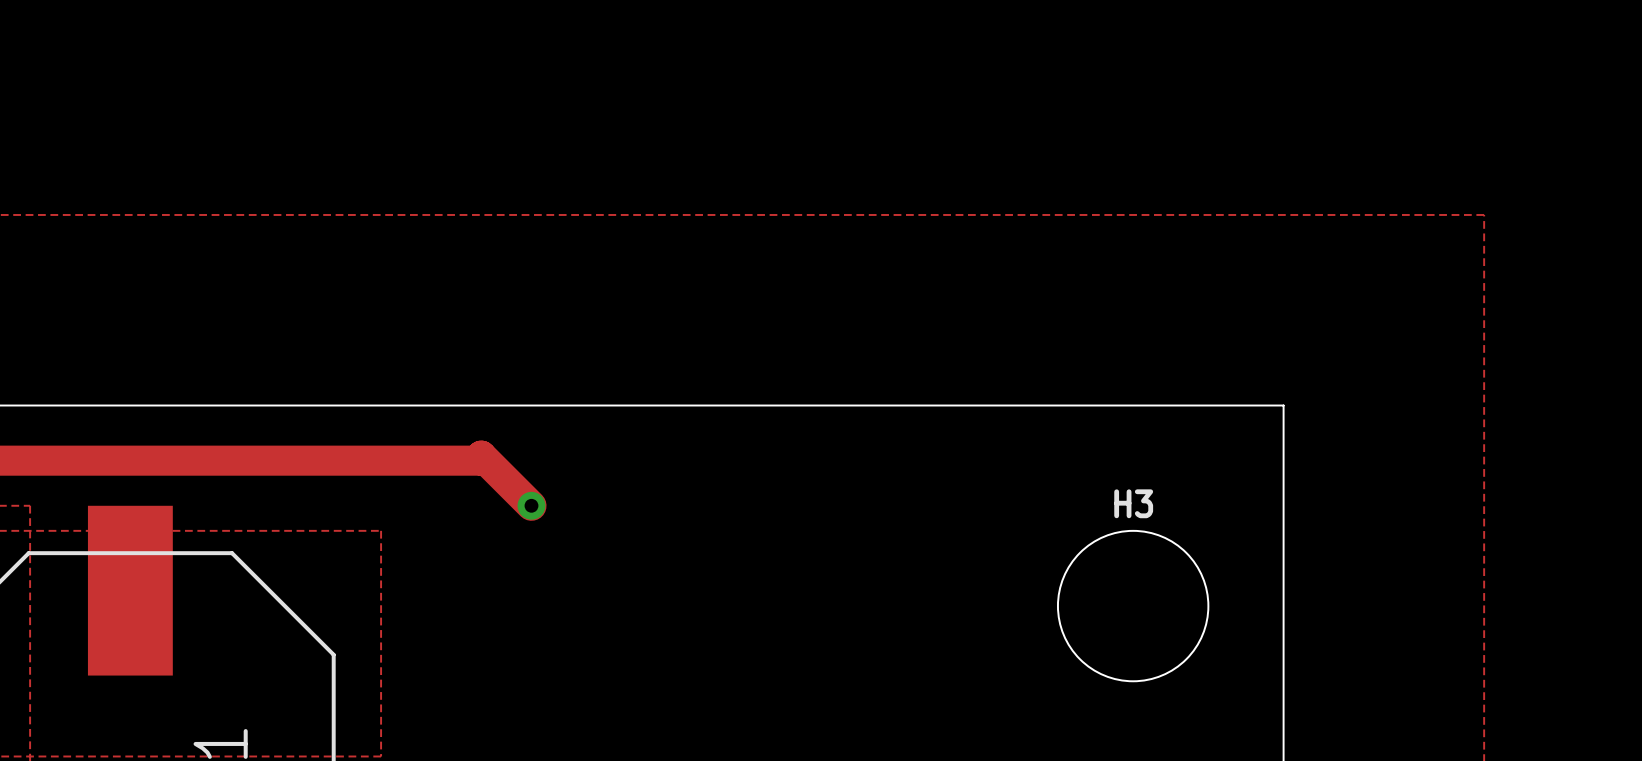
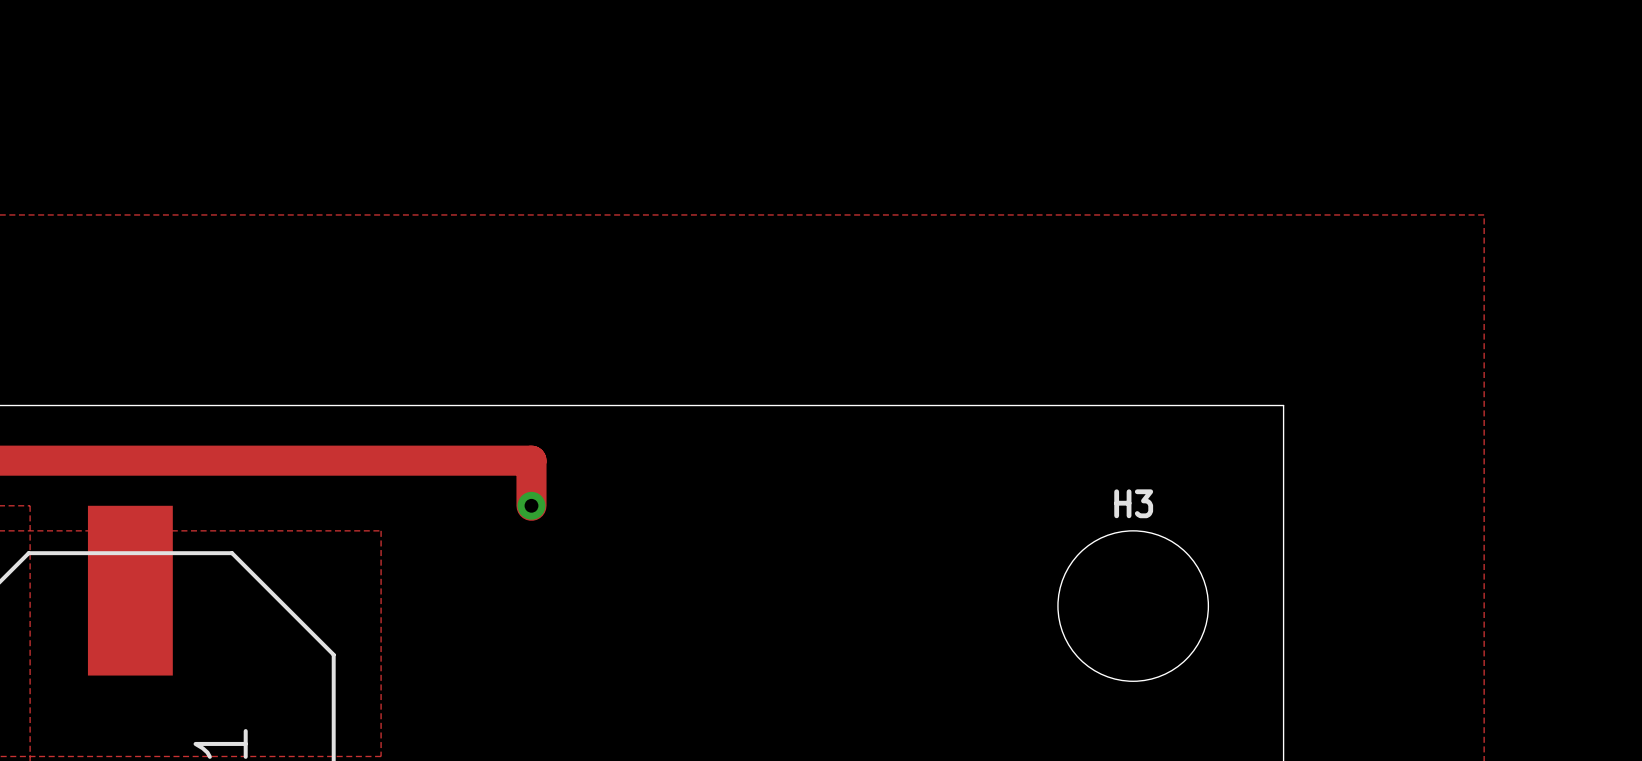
track: (481, 460) (481, 455) (531, 505) -> (481, 460) (531, 460) (531, 505)

